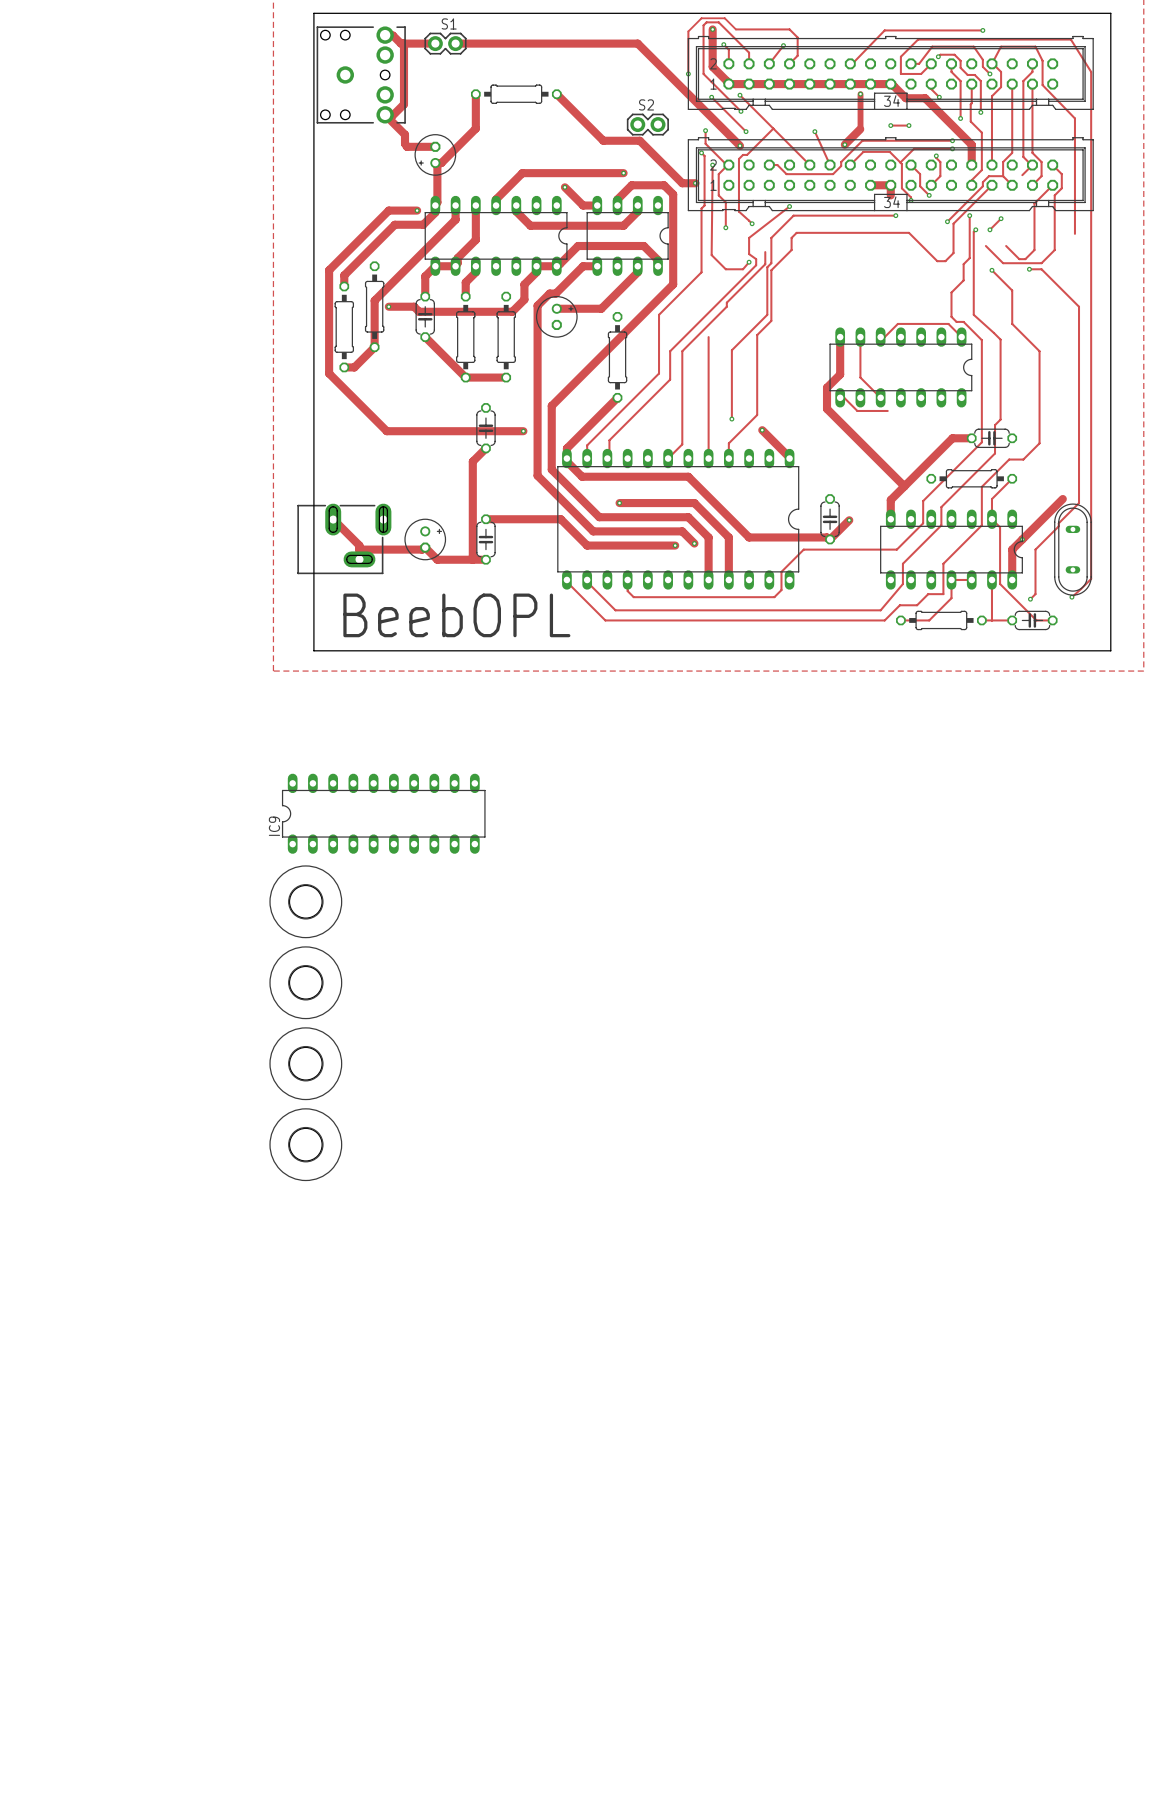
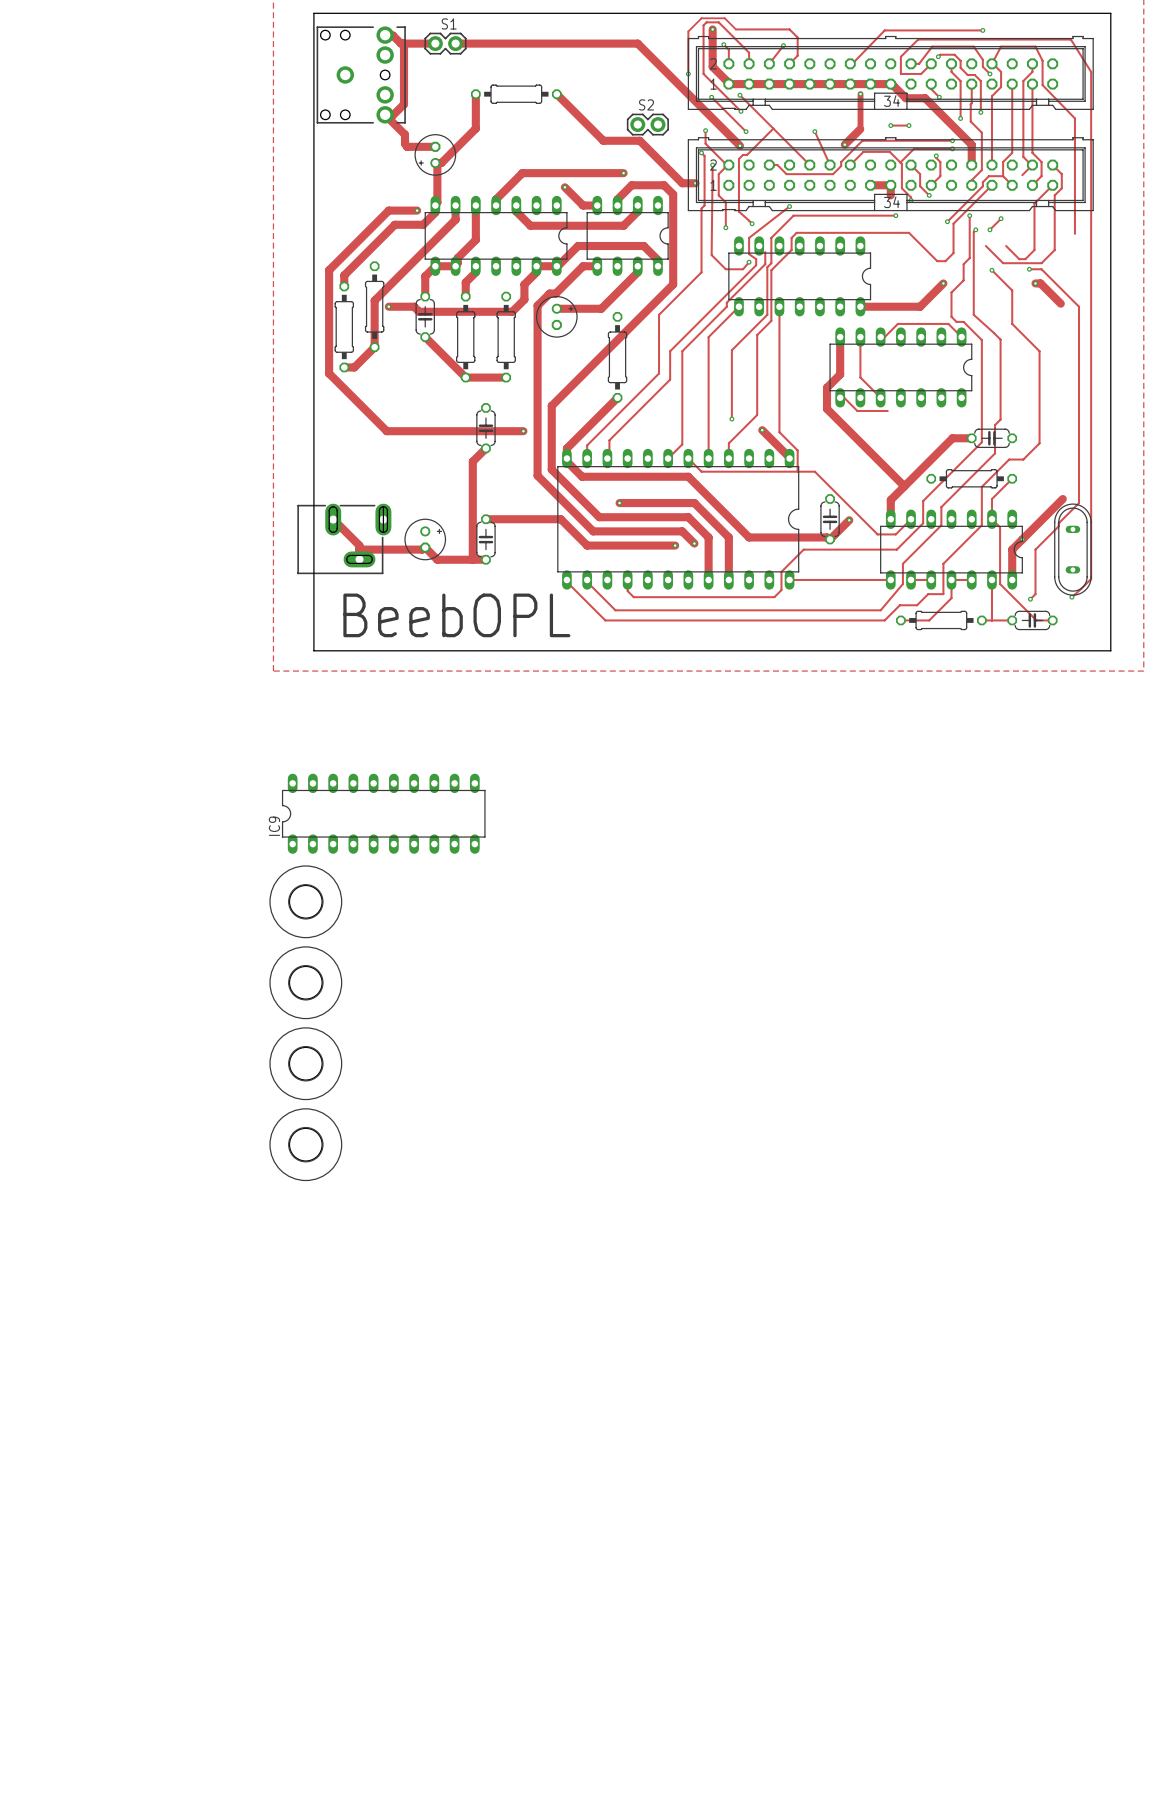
part: none -> (799, 276)
track: none -> (943, 283) (920, 306) (860, 306)
via: none -> (943, 283)
track: none -> (1035, 283) (1040, 283) (1060, 303)
via: none -> (1035, 283)
track: none -> (738, 306) (708, 337)
track: none -> (779, 306) (779, 432) (797, 450) (797, 471)
track: none -> (688, 458) (701, 471) (814, 471) (877, 534) (895, 534) (911, 519)
track: none -> (789, 579) (890, 579)
track: none -> (911, 579) (931, 579)

